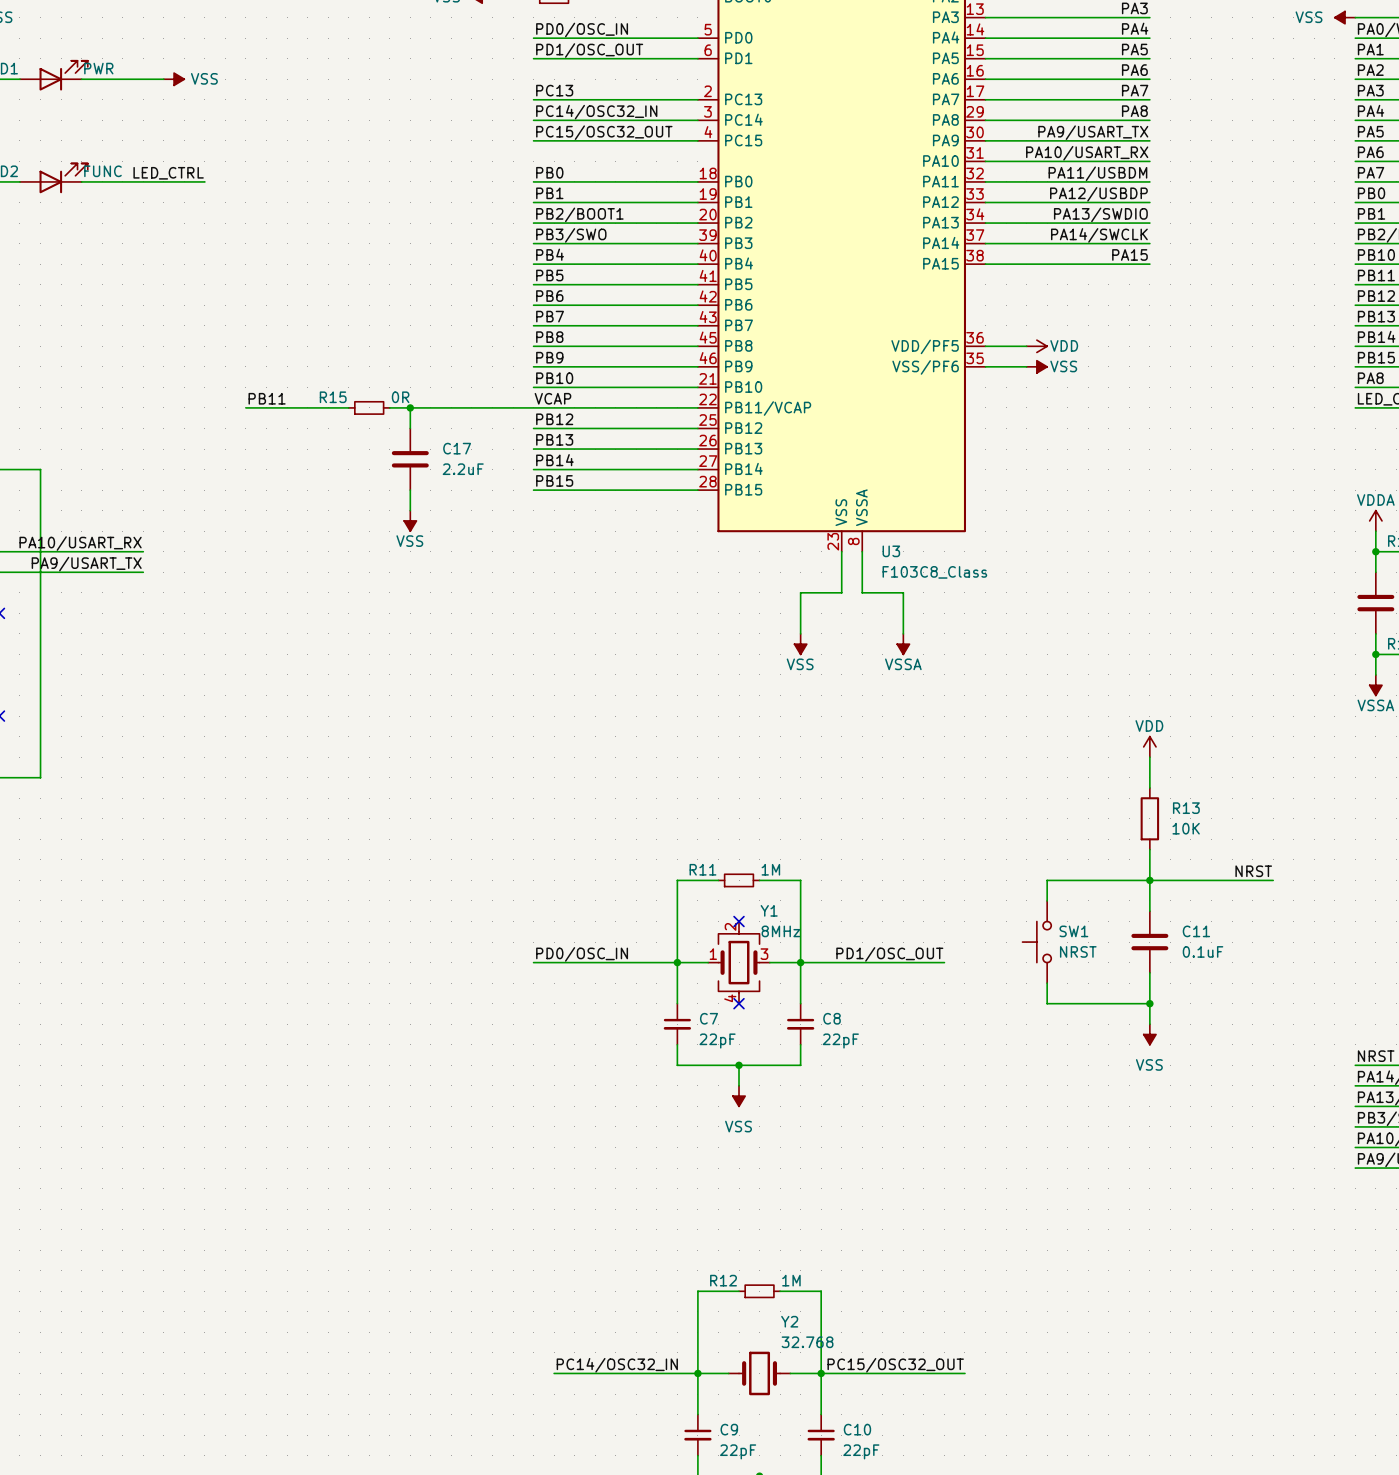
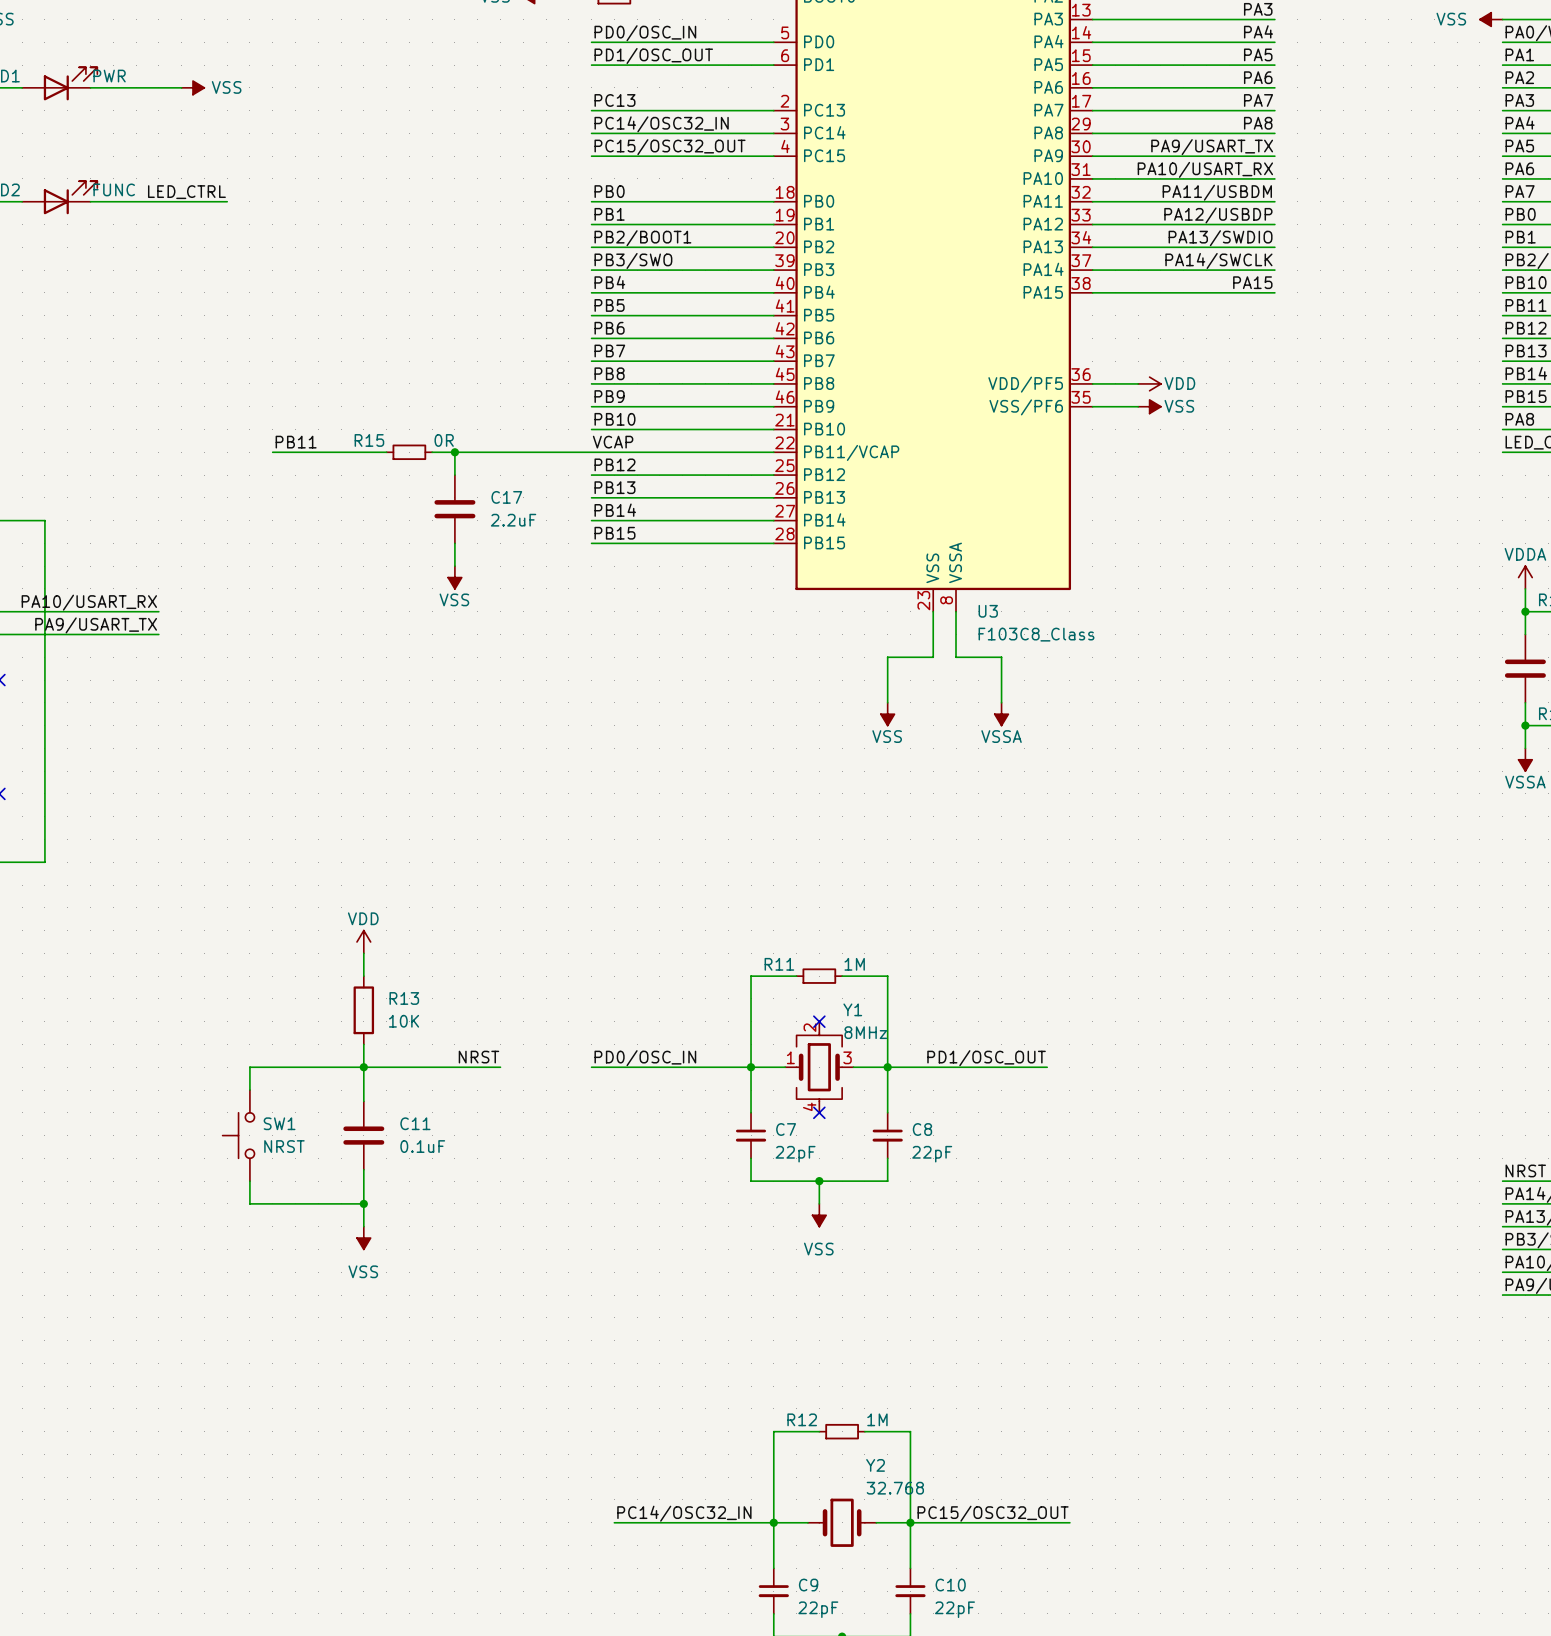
power symbol: VDD (1149, 746) -> none
wire: (1149, 757) (1149, 787) -> none
R13 position: (1149, 818) -> (363, 1010)
power symbol: none -> VDD (363, 941)
wire: (1149, 849) (1149, 911) -> none
wire: none -> (363, 953) (363, 976)
label: NRST (1253, 871) -> none
junction: (1149, 880) -> none
wire: (1273, 880) (1047, 880) (1047, 900) -> none
wire: none -> (363, 1044) (363, 1101)
SW1 position: (1036, 942) -> (238, 1135)
C11 position: (1149, 942) -> (363, 1135)
label: none -> NRST (478, 1057)
junction: none -> (363, 1067)
wire: none -> (500, 1067) (249, 1067) (249, 1090)
wire: (1149, 972) (1149, 1024) -> none
wire: (1047, 983) (1047, 1003) (1149, 1003) -> none
junction: (1149, 1003) -> none
power symbol: VSS (1149, 1034) -> none
wire: none -> (363, 1169) (363, 1226)
wire: none -> (249, 1181) (249, 1203) (363, 1203)
junction: none -> (363, 1203)
power symbol: none -> VSS (363, 1238)

